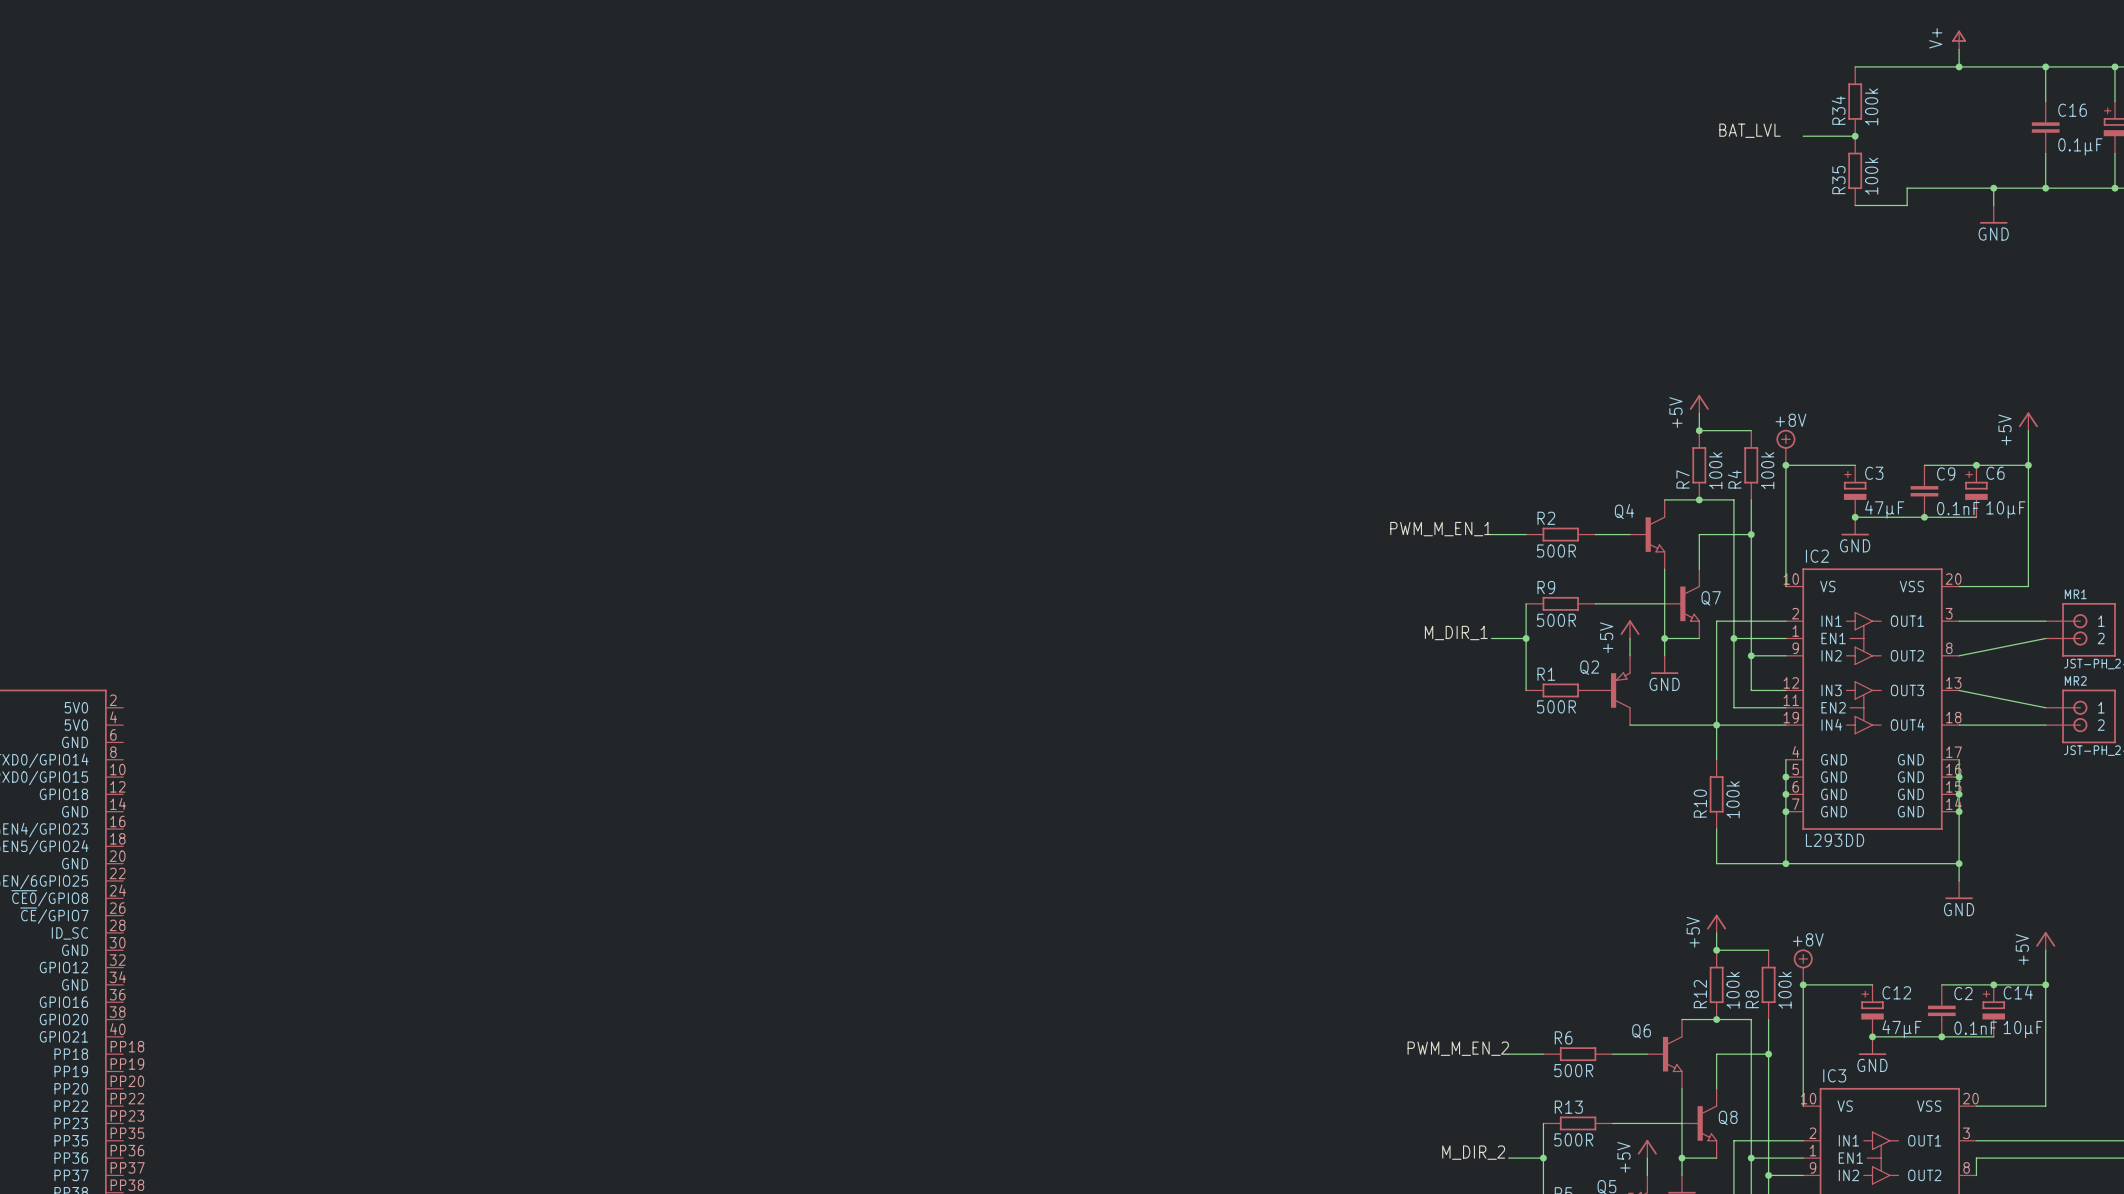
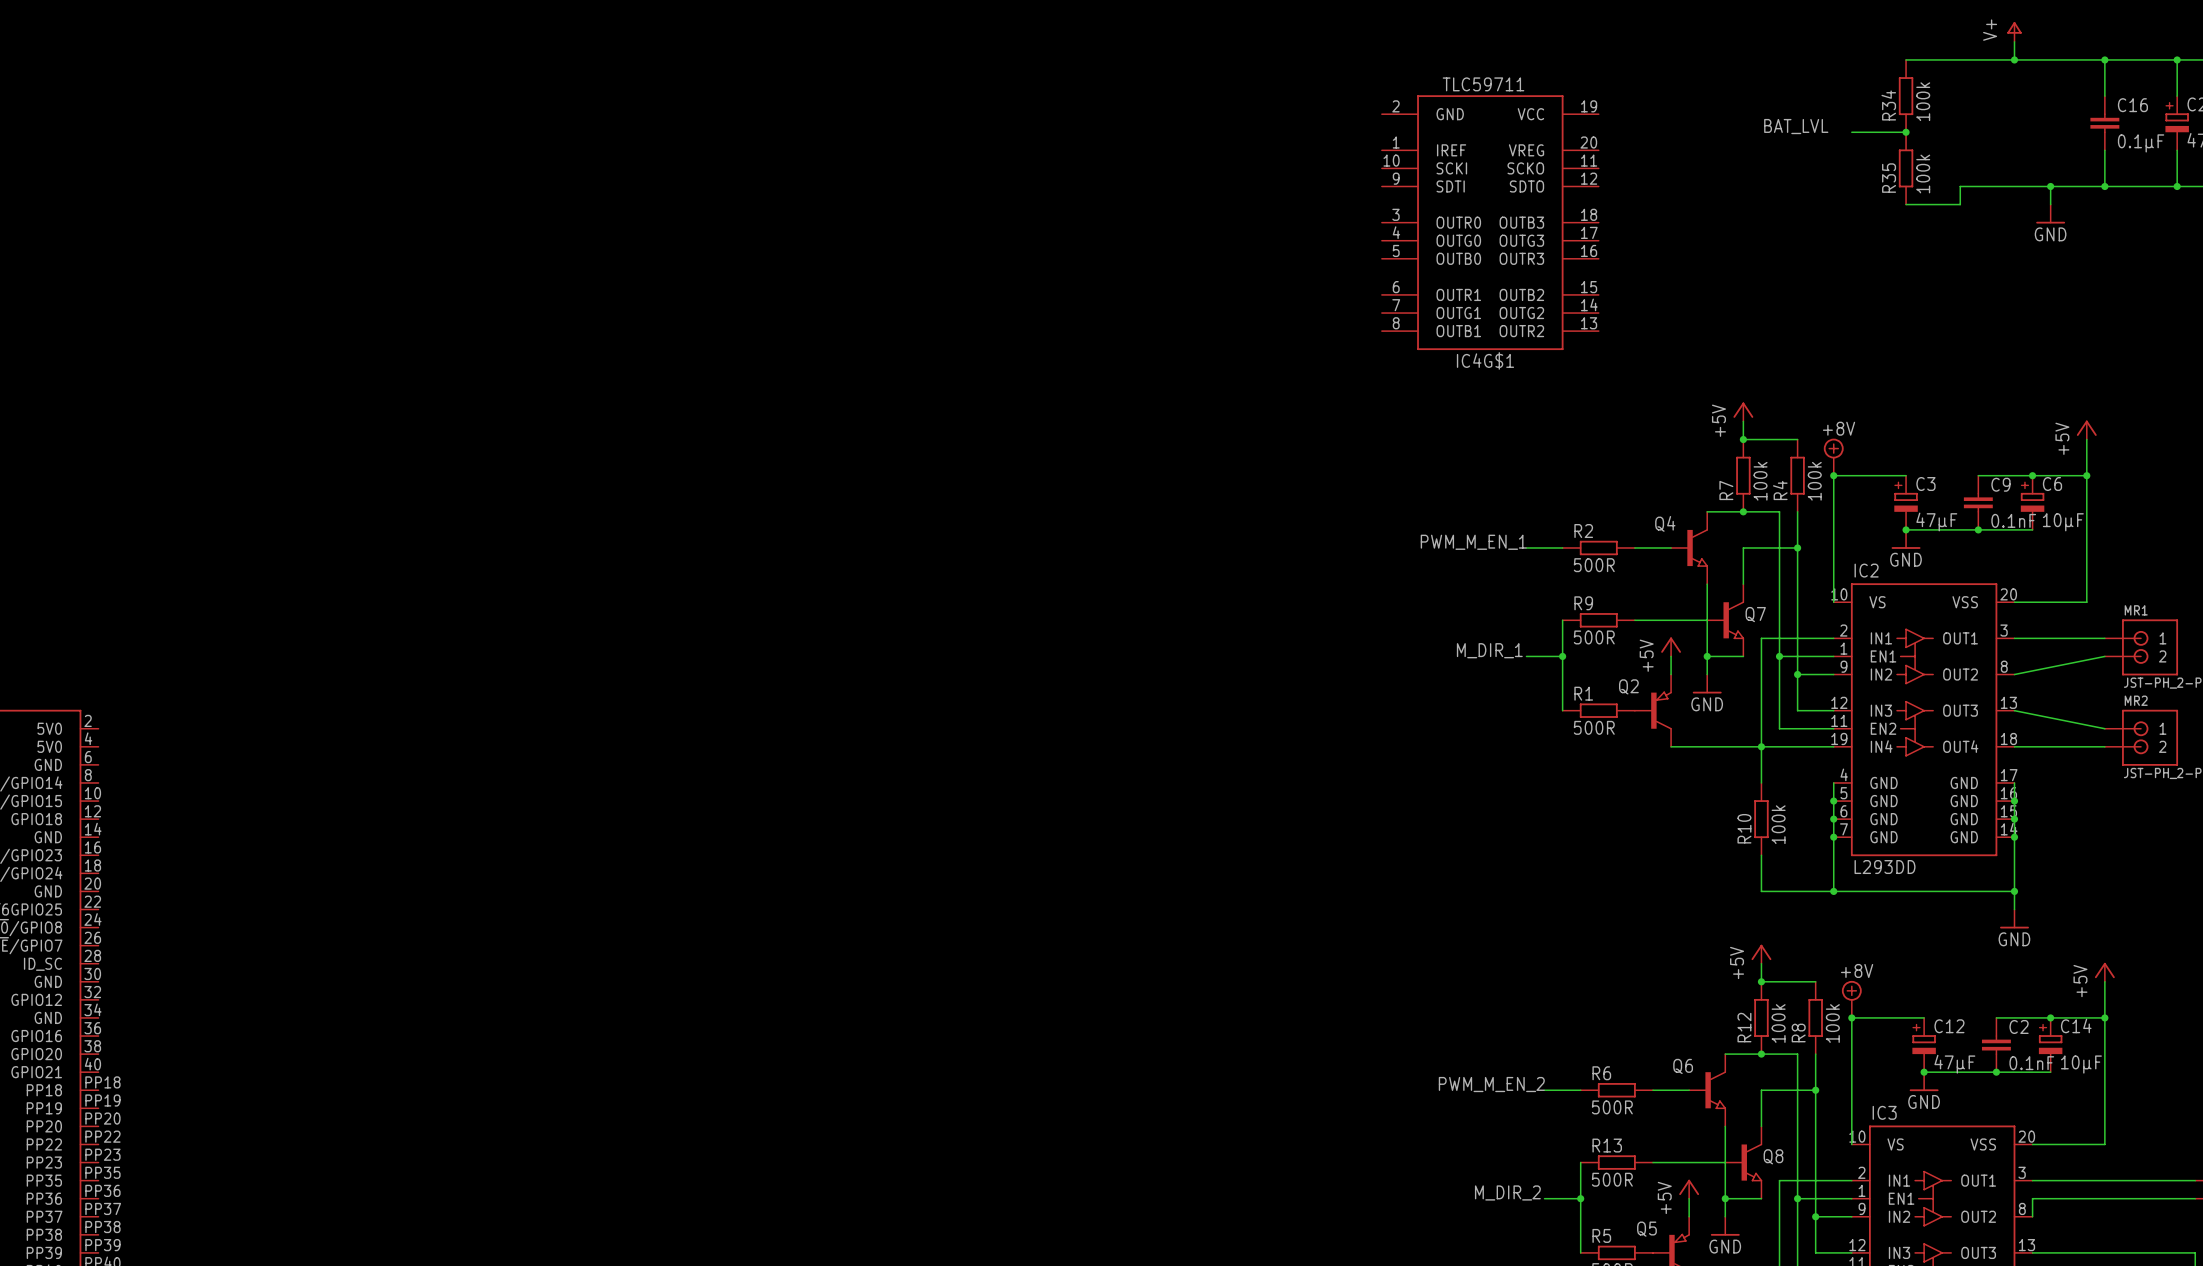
IC4G$1: none -> (1490, 222)

